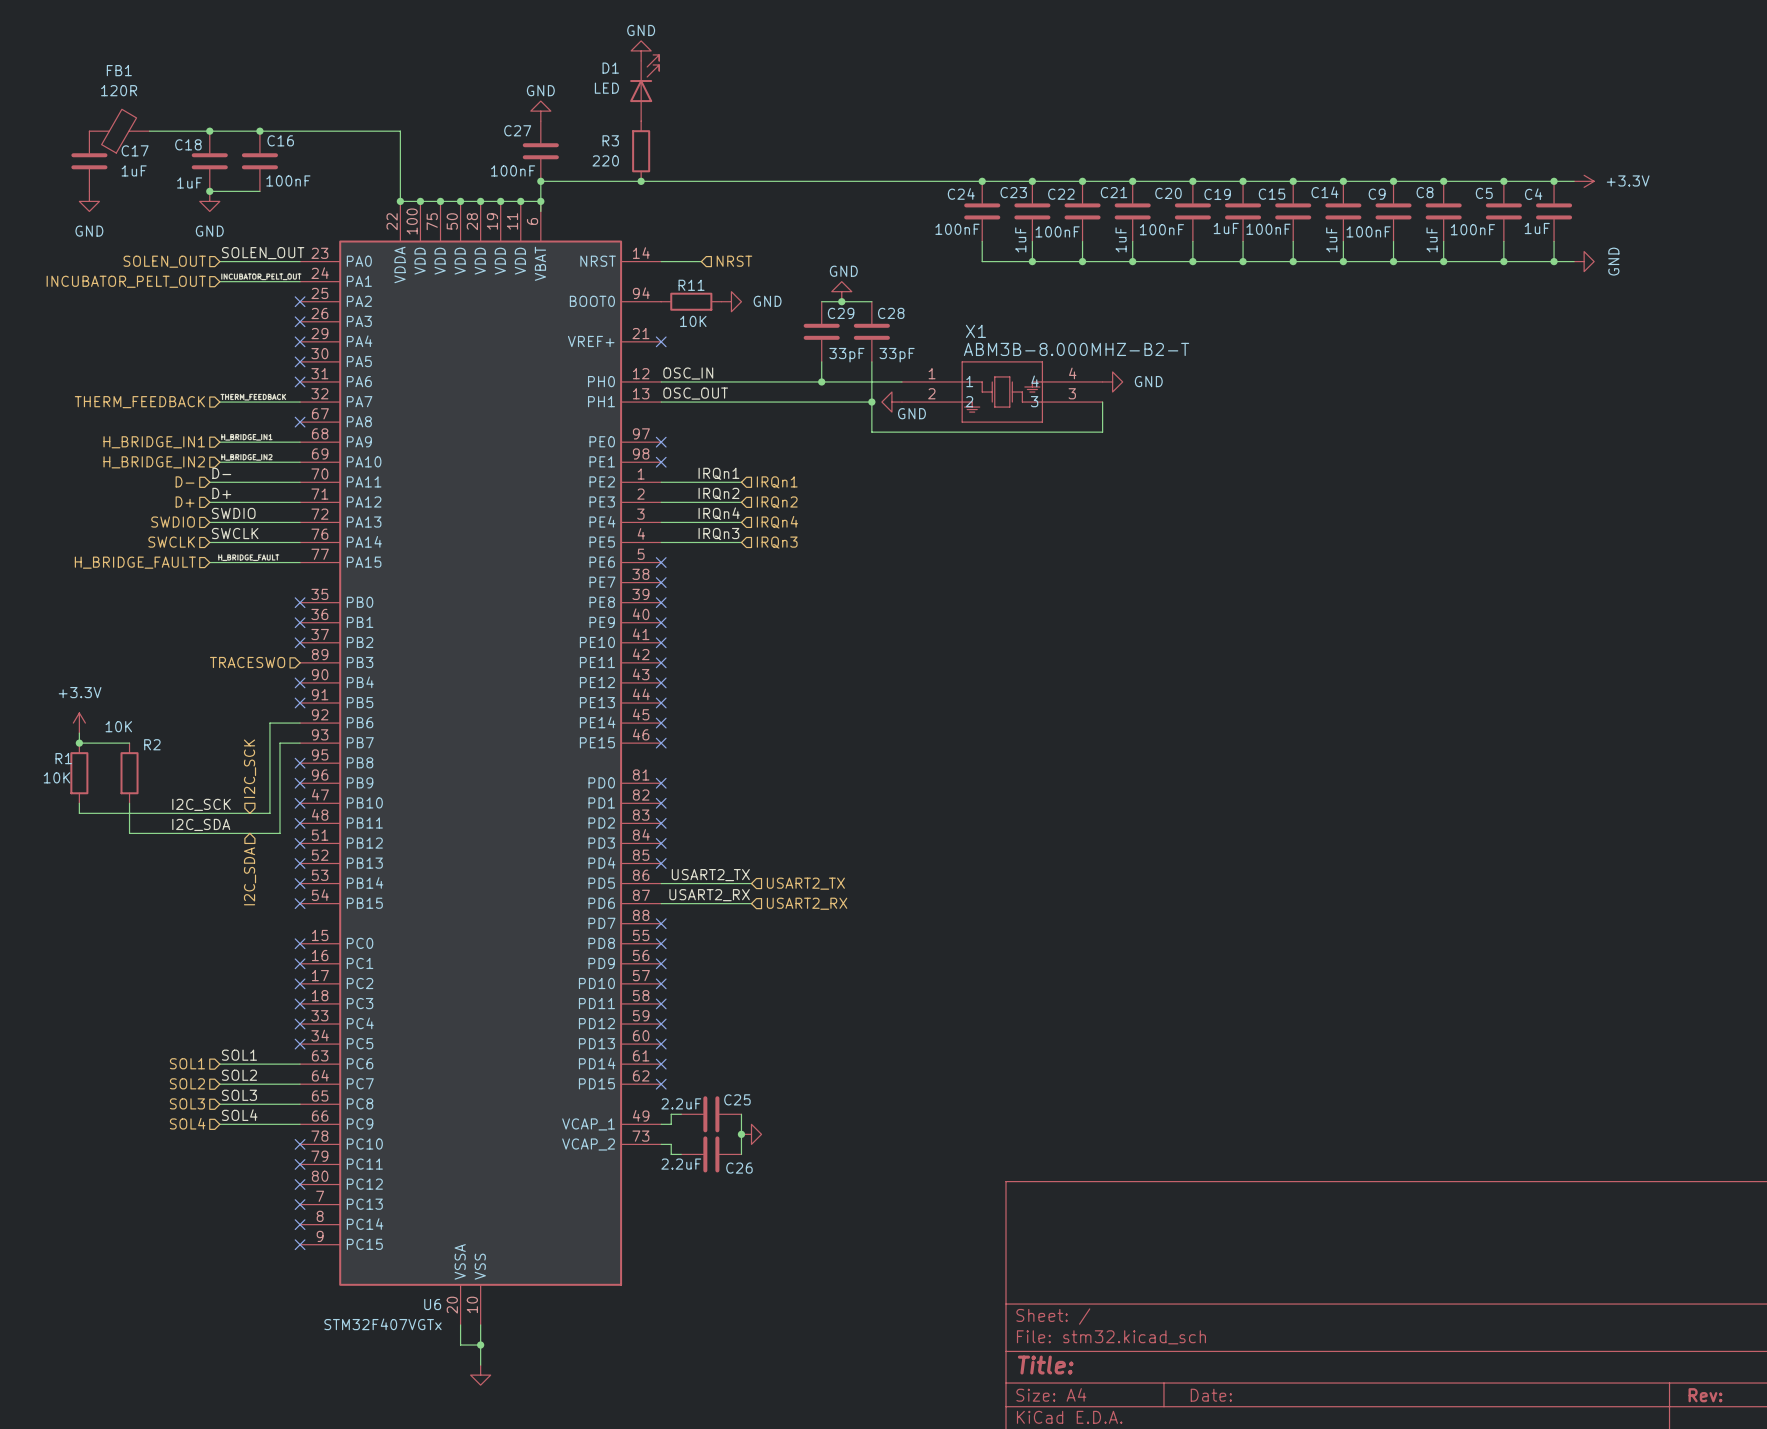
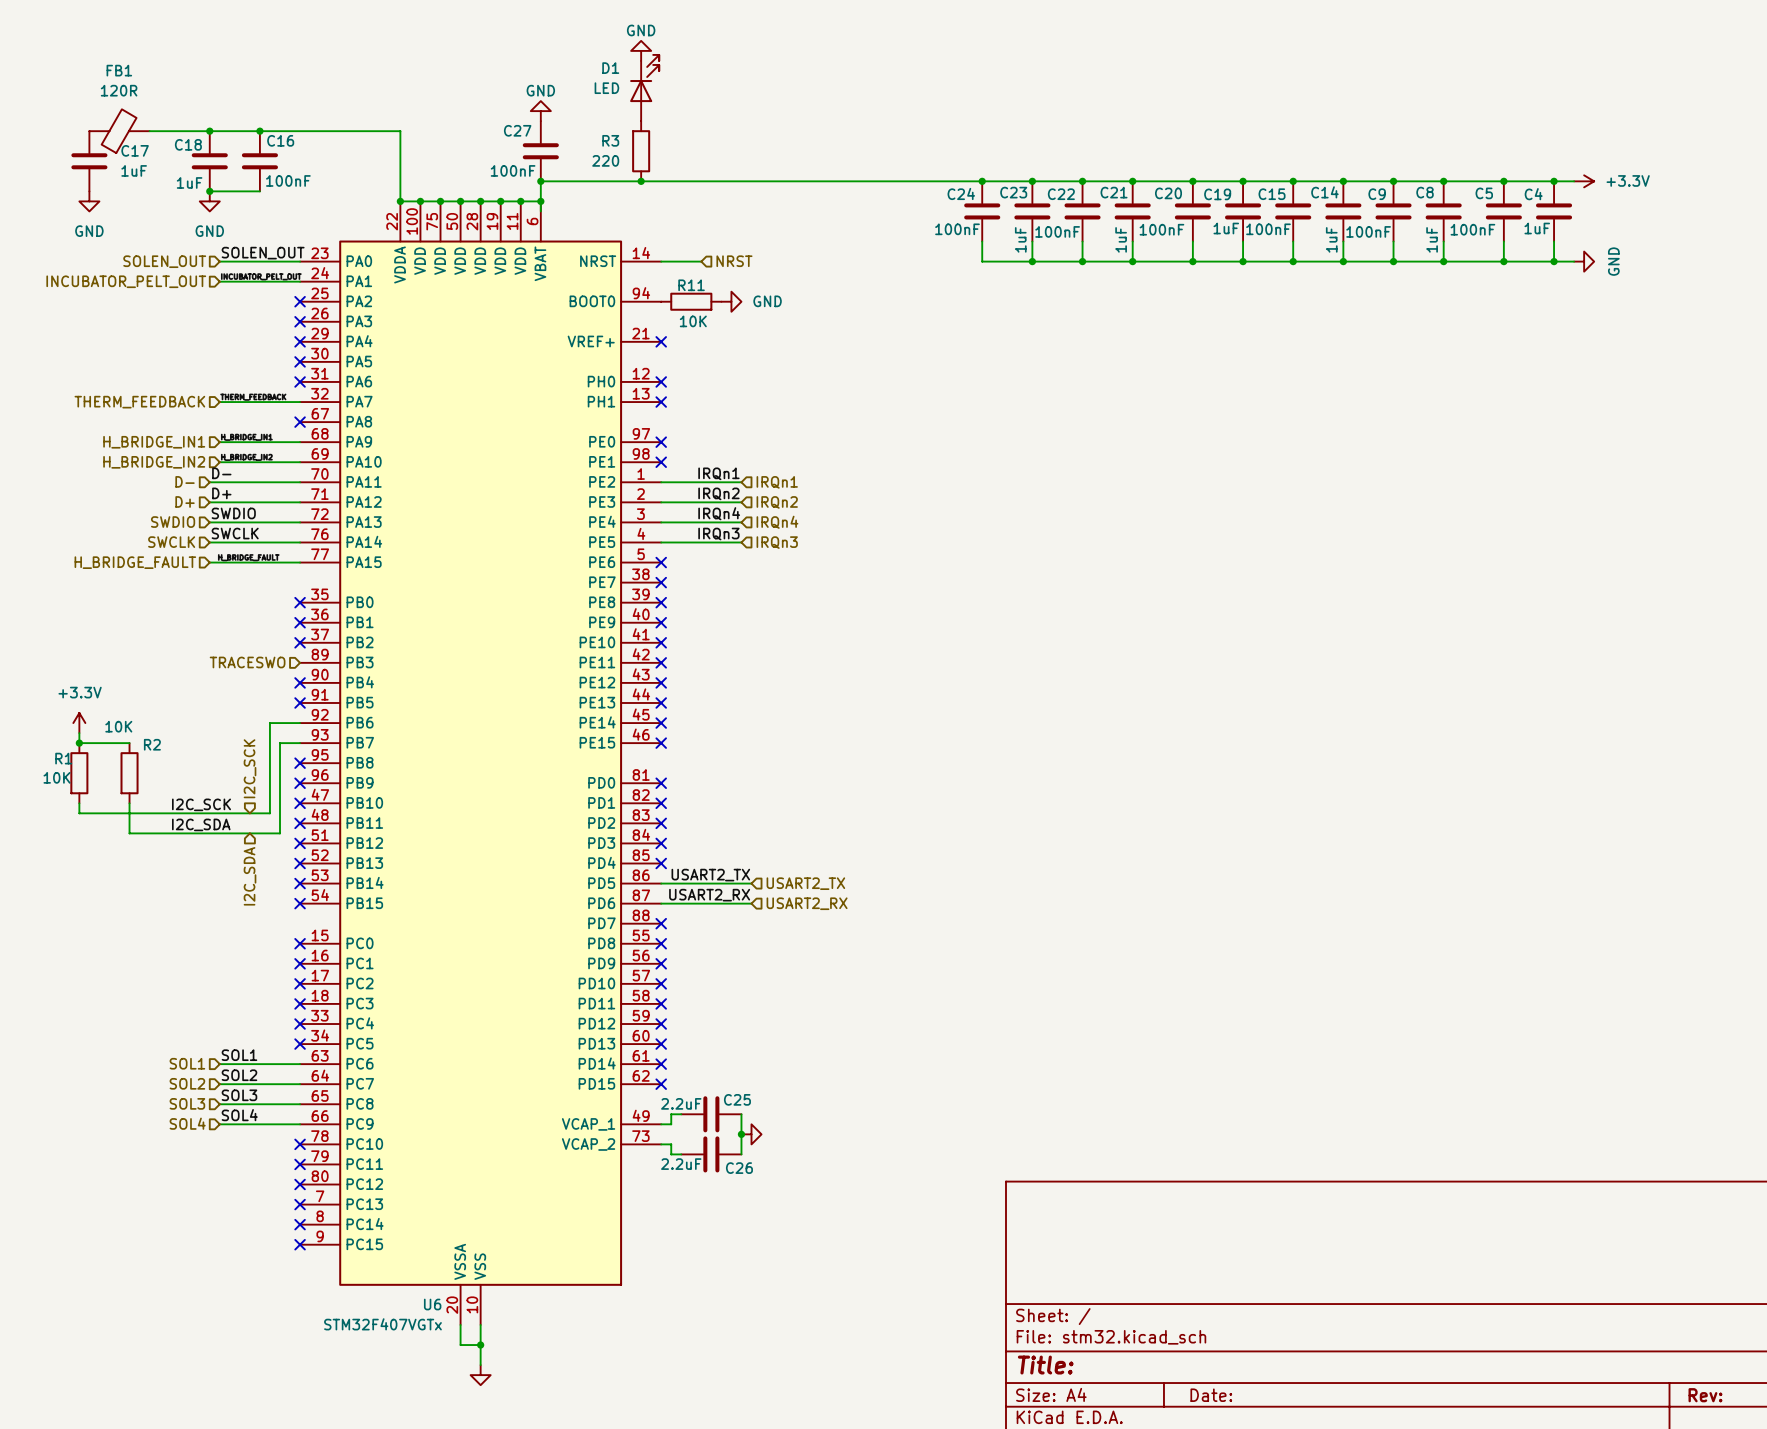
power symbol: GND (841, 291) -> none
wire: (821, 301) (871, 301) -> none
junction: (841, 301) -> none
C29: 33pF (821, 331) -> none
C28: 33pF (871, 331) -> none
wire: (821, 361) (821, 381) -> none
wire: (871, 361) (871, 432) (1102, 432) (1102, 402) -> none
label: OSC_IN (688, 373) -> none
wire: (661, 381) (901, 381) -> none
no-connect mark: none -> (661, 381)
junction: (821, 381) -> none
power symbol: GND (1112, 381) -> none
X1: ABM3B-8.000MHZ-B2-T (1002, 392) -> none
label: OSC_OUT (695, 393) -> none
wire: (661, 402) (871, 402) -> none
no-connect mark: none -> (661, 402)
junction: (871, 402) -> none
power symbol: GND (891, 402) -> none

